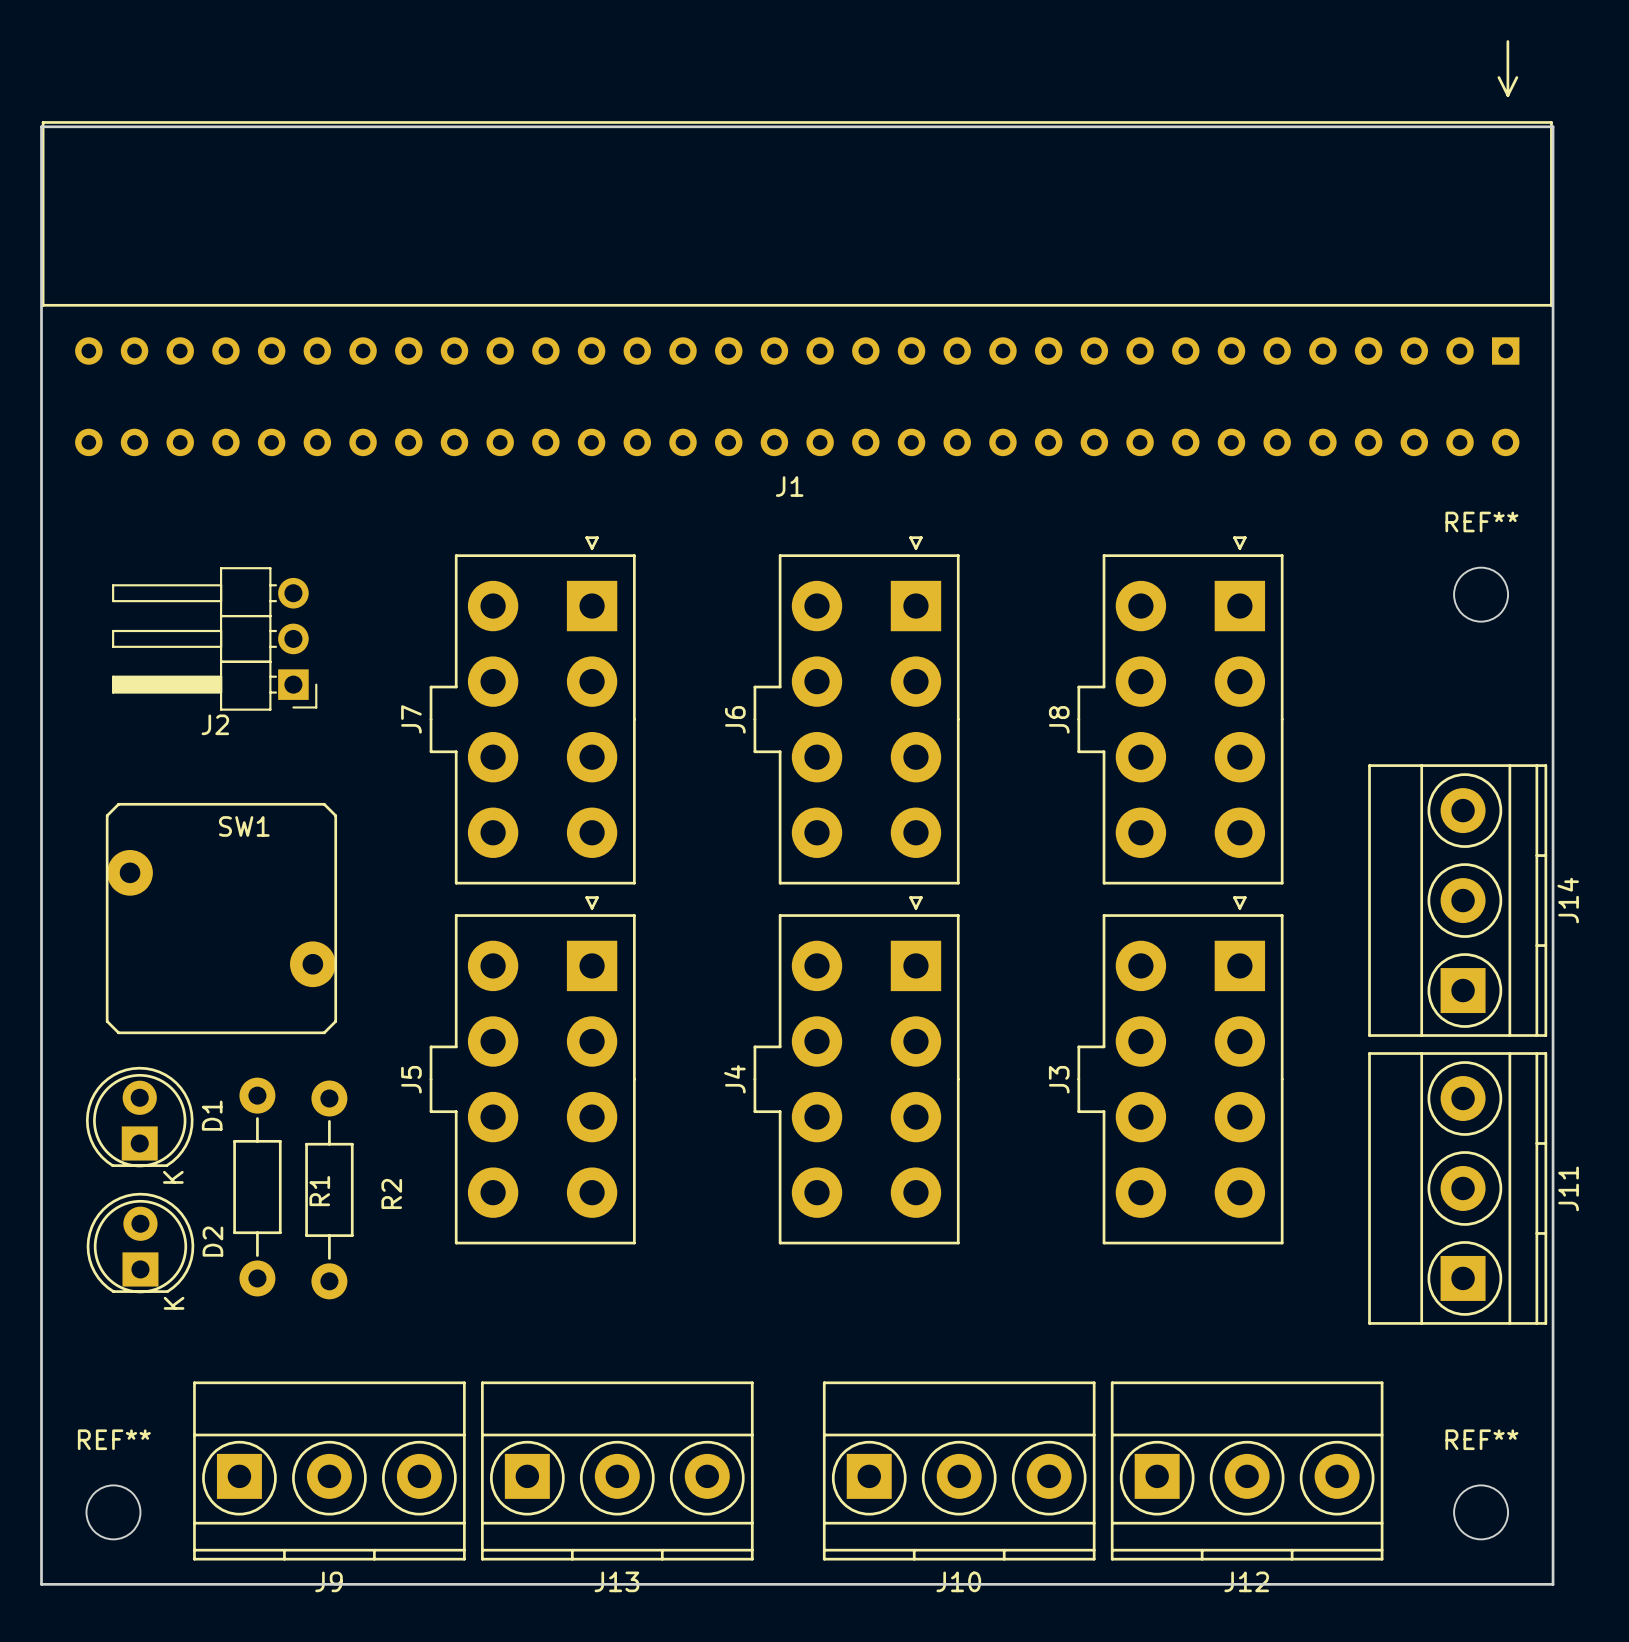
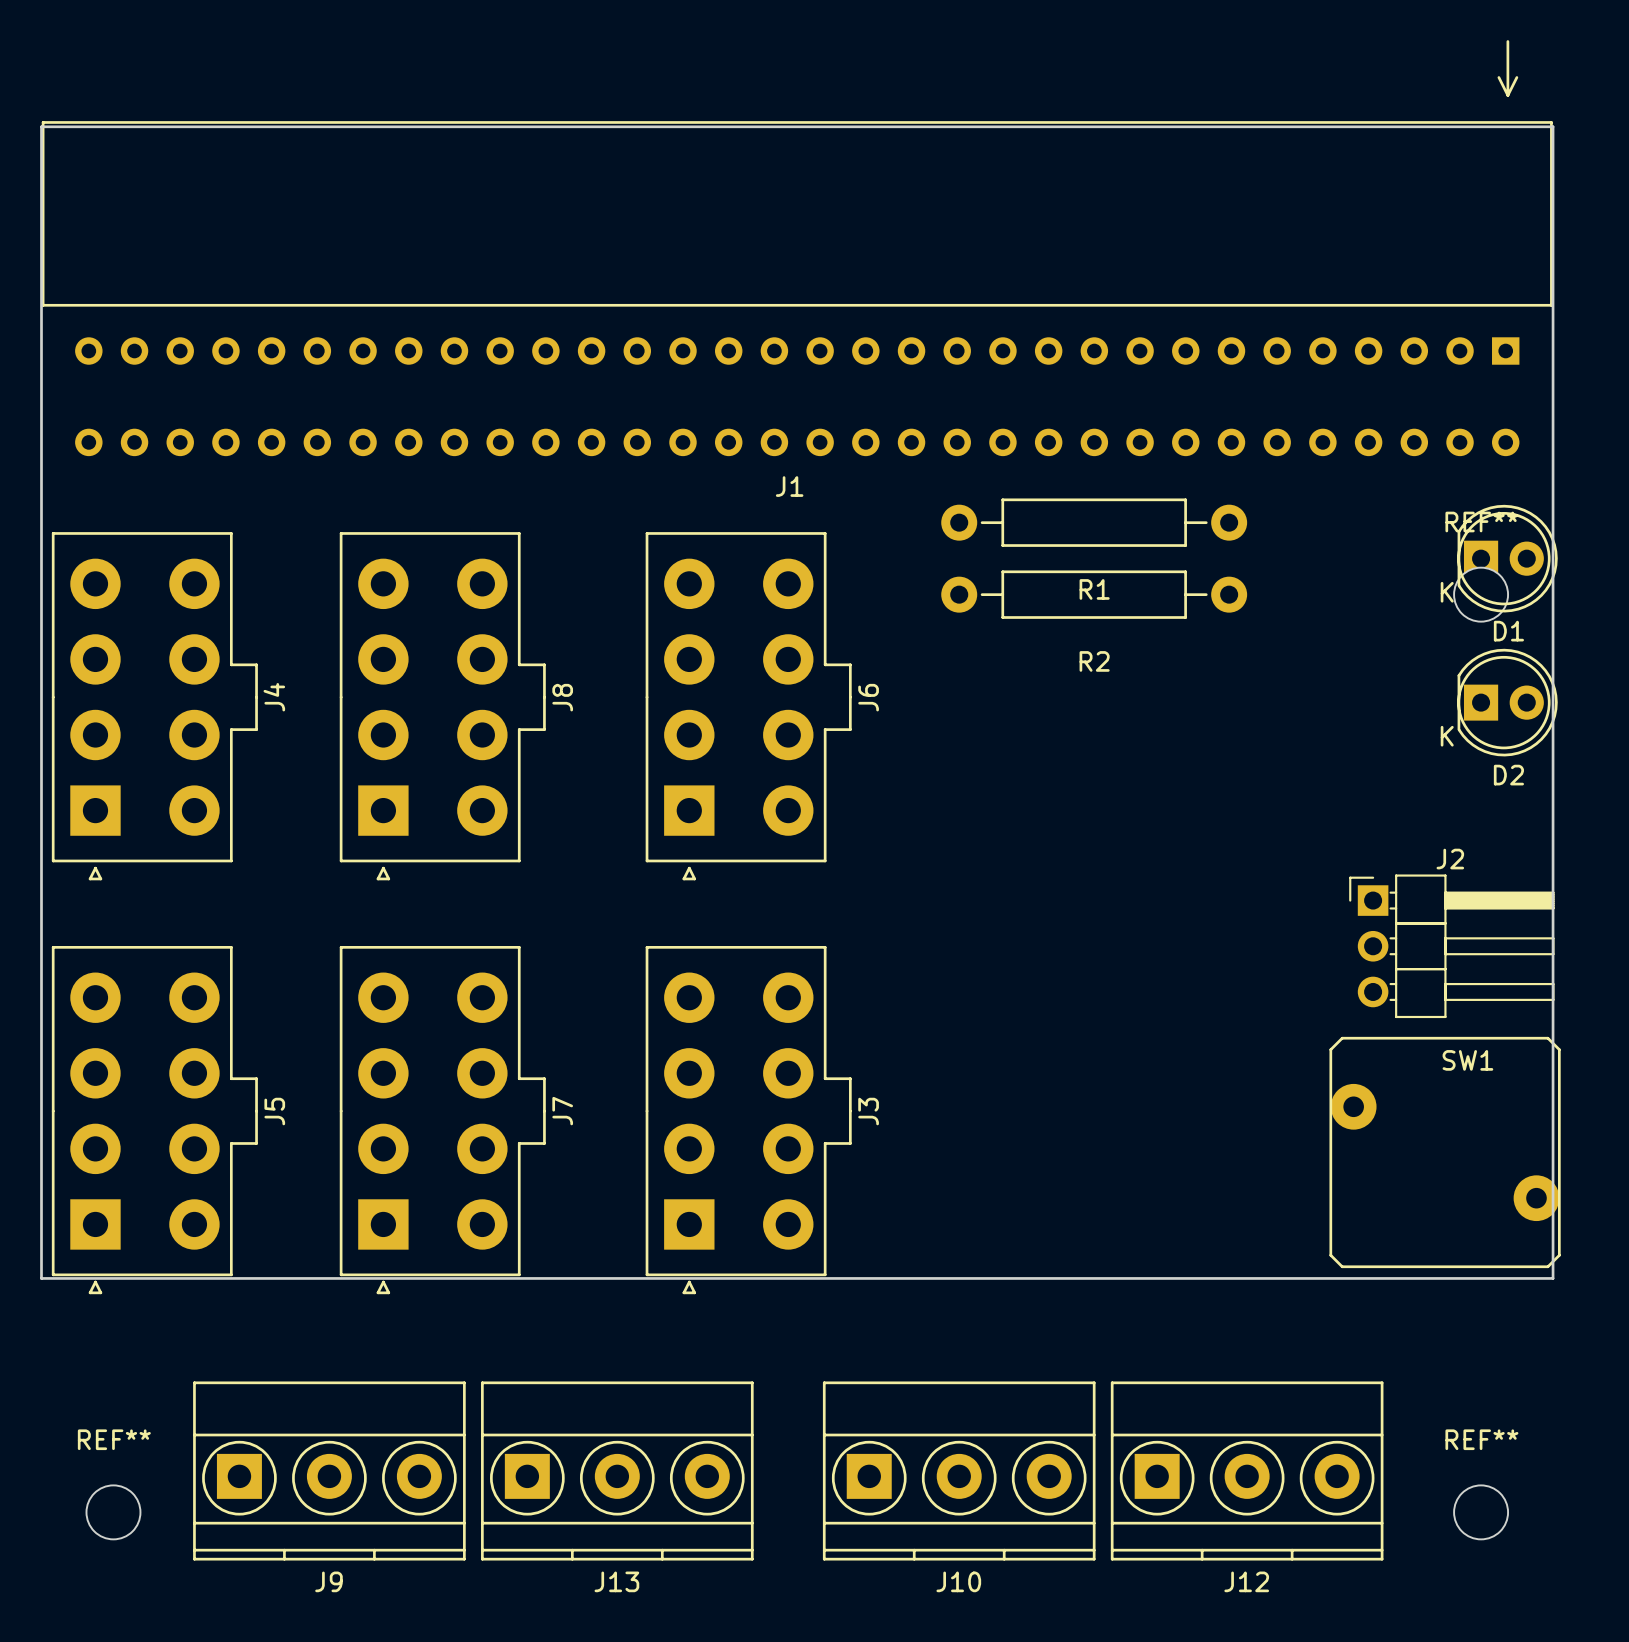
J2 rotation: 0° (214, 638) -> 180° (1451, 946)
J2 position: (214, 638) -> (1451, 946)
J7 rotation: 0° (532, 710) -> 180° (442, 1120)
J7 position: (532, 710) -> (442, 1120)
J6 rotation: 0° (856, 710) -> 180° (748, 706)
J8 rotation: 0° (1180, 710) -> 180° (442, 706)
J8 position: (1180, 710) -> (442, 706)
J14: (1457, 900) -> none
SW1 position: (221, 918) -> (1445, 1152)
J5 rotation: 0° (532, 1070) -> 180° (154, 1120)
J5 position: (532, 1070) -> (154, 1120)
J4 rotation: 0° (856, 1070) -> 180° (154, 706)
J4 position: (856, 1070) -> (154, 706)
J3 rotation: 0° (1180, 1070) -> 180° (748, 1120)
J3 position: (1180, 1070) -> (748, 1120)
R1 footprint: [233, 1077, 282, 1297] -> [941, 498, 1248, 547]
R2 footprint: [305, 1080, 354, 1300] -> [941, 570, 1248, 619]
D1 rotation: 0° (139, 1117) -> 90° clockwise (1507, 558)
D1 position: (139, 1117) -> (1507, 558)
J11: (1457, 1188) -> none
R1 name position: R1 (319, 1191) -> R1 (1094, 589)
R2 name position: R2 (391, 1193) -> R2 (1094, 661)
D2 rotation: 0° (140, 1243) -> 90° clockwise (1507, 702)
D2 position: (140, 1243) -> (1507, 702)
board edge: (41, 1278) (41, 1584) (1553, 1584) (1553, 1278) -> (41, 1278) (1553, 1278)

